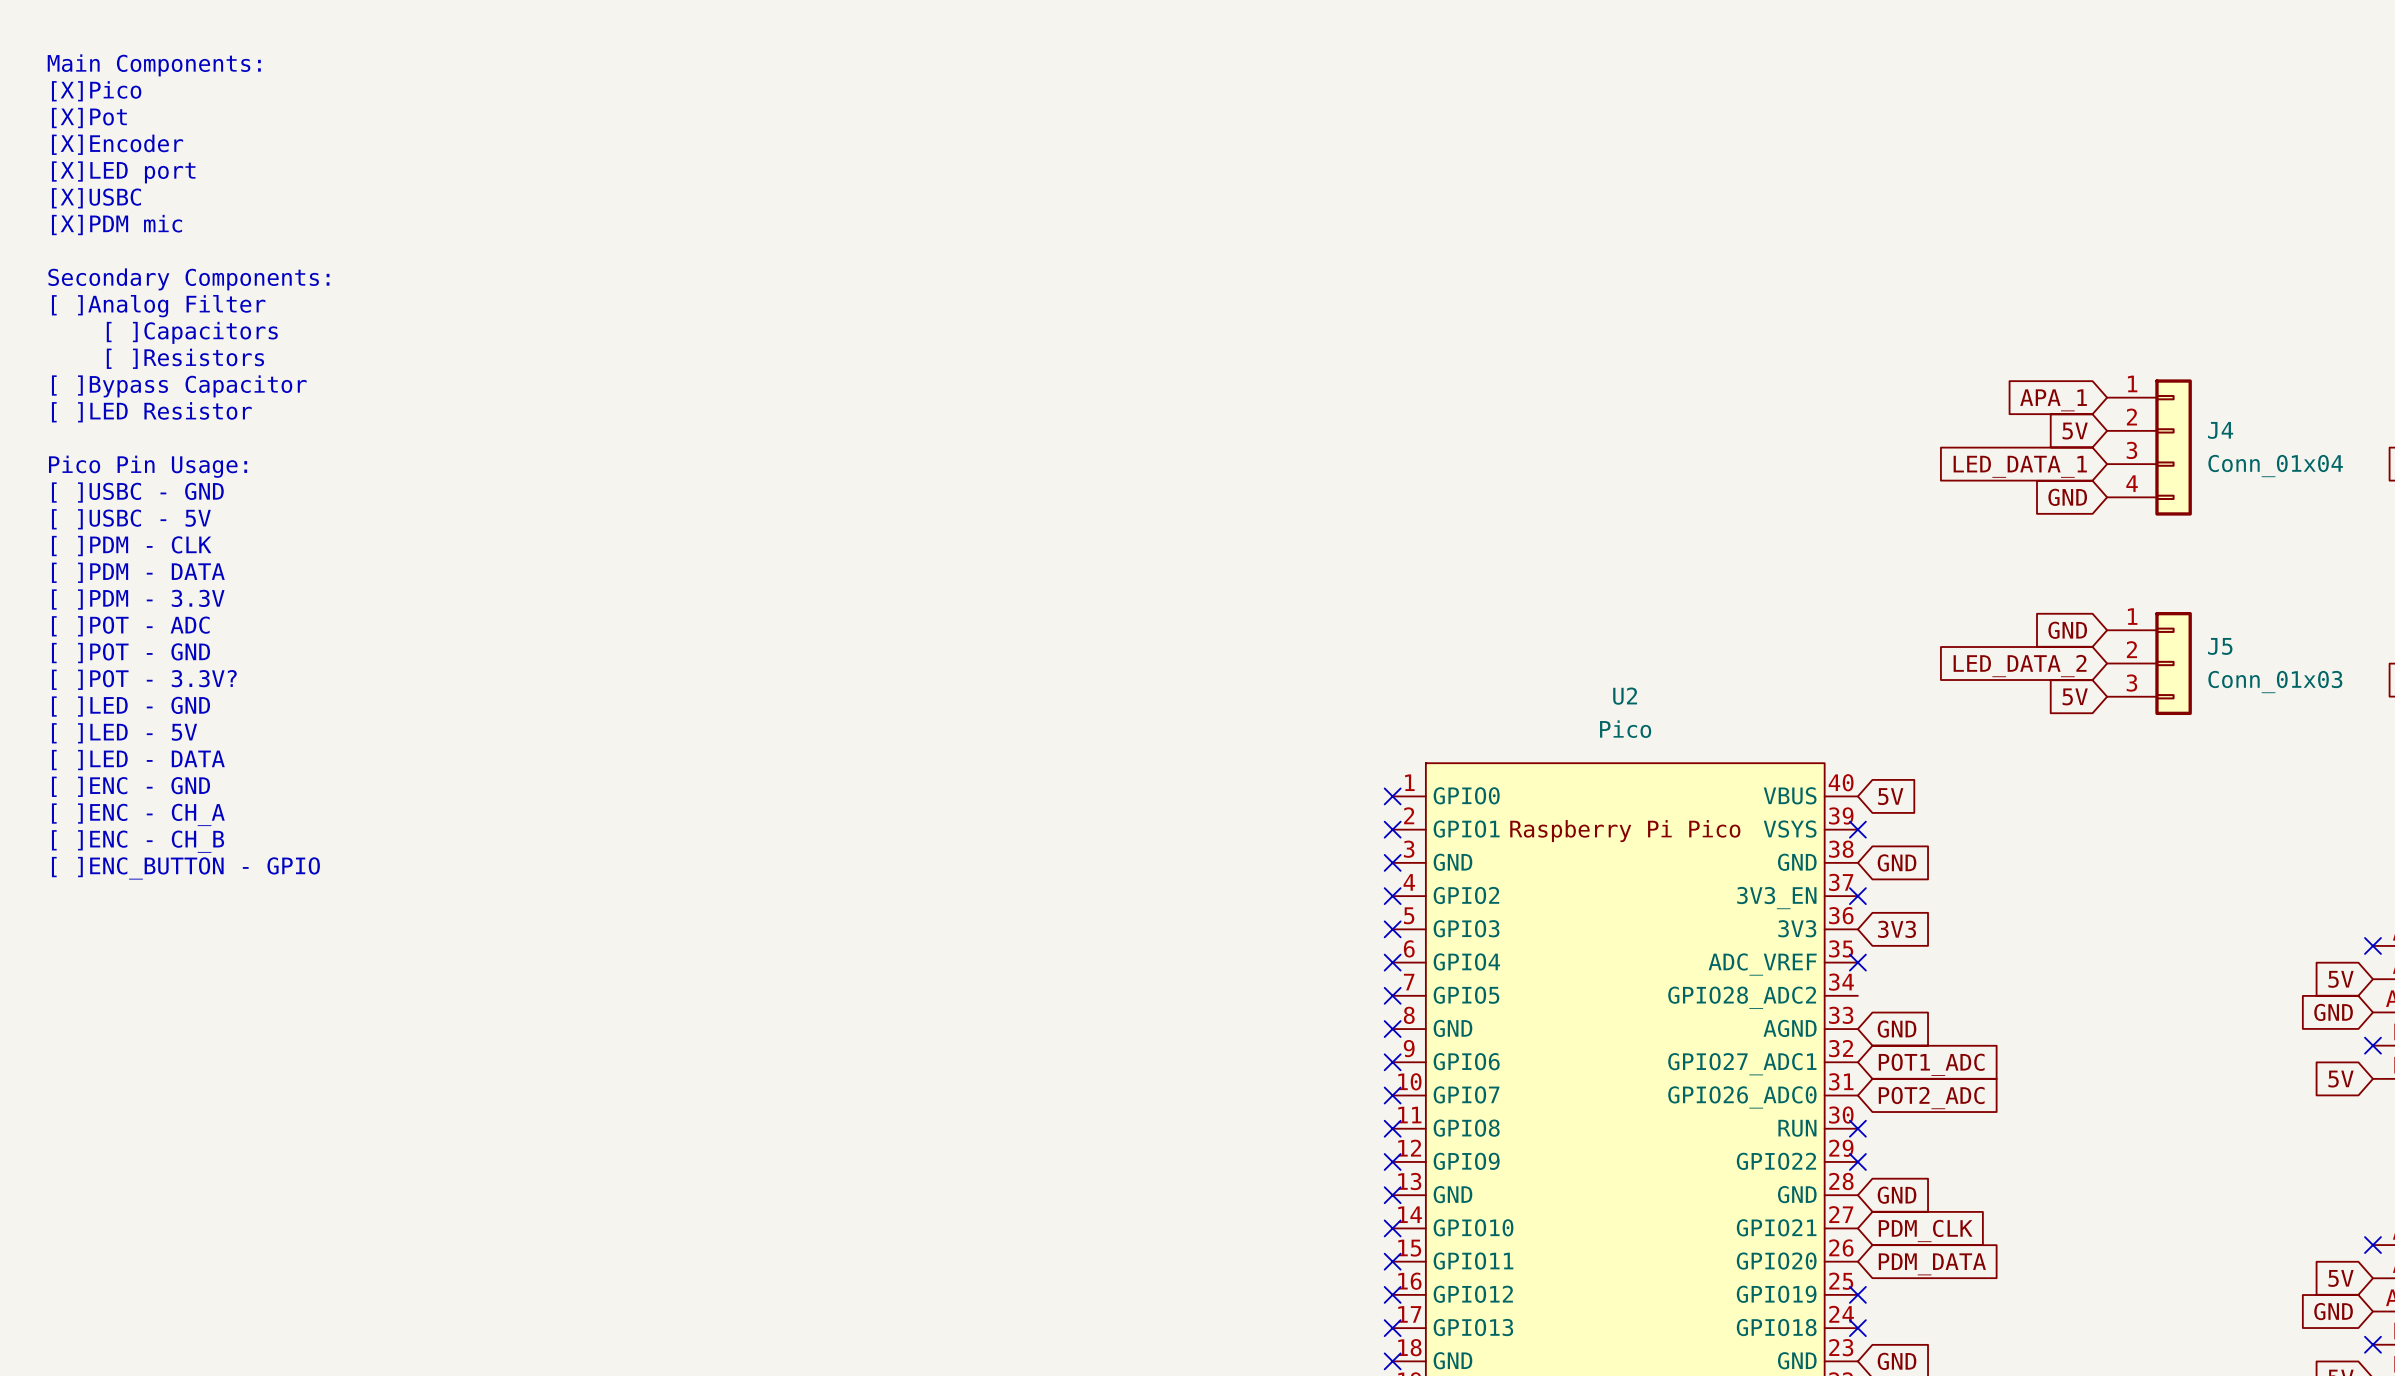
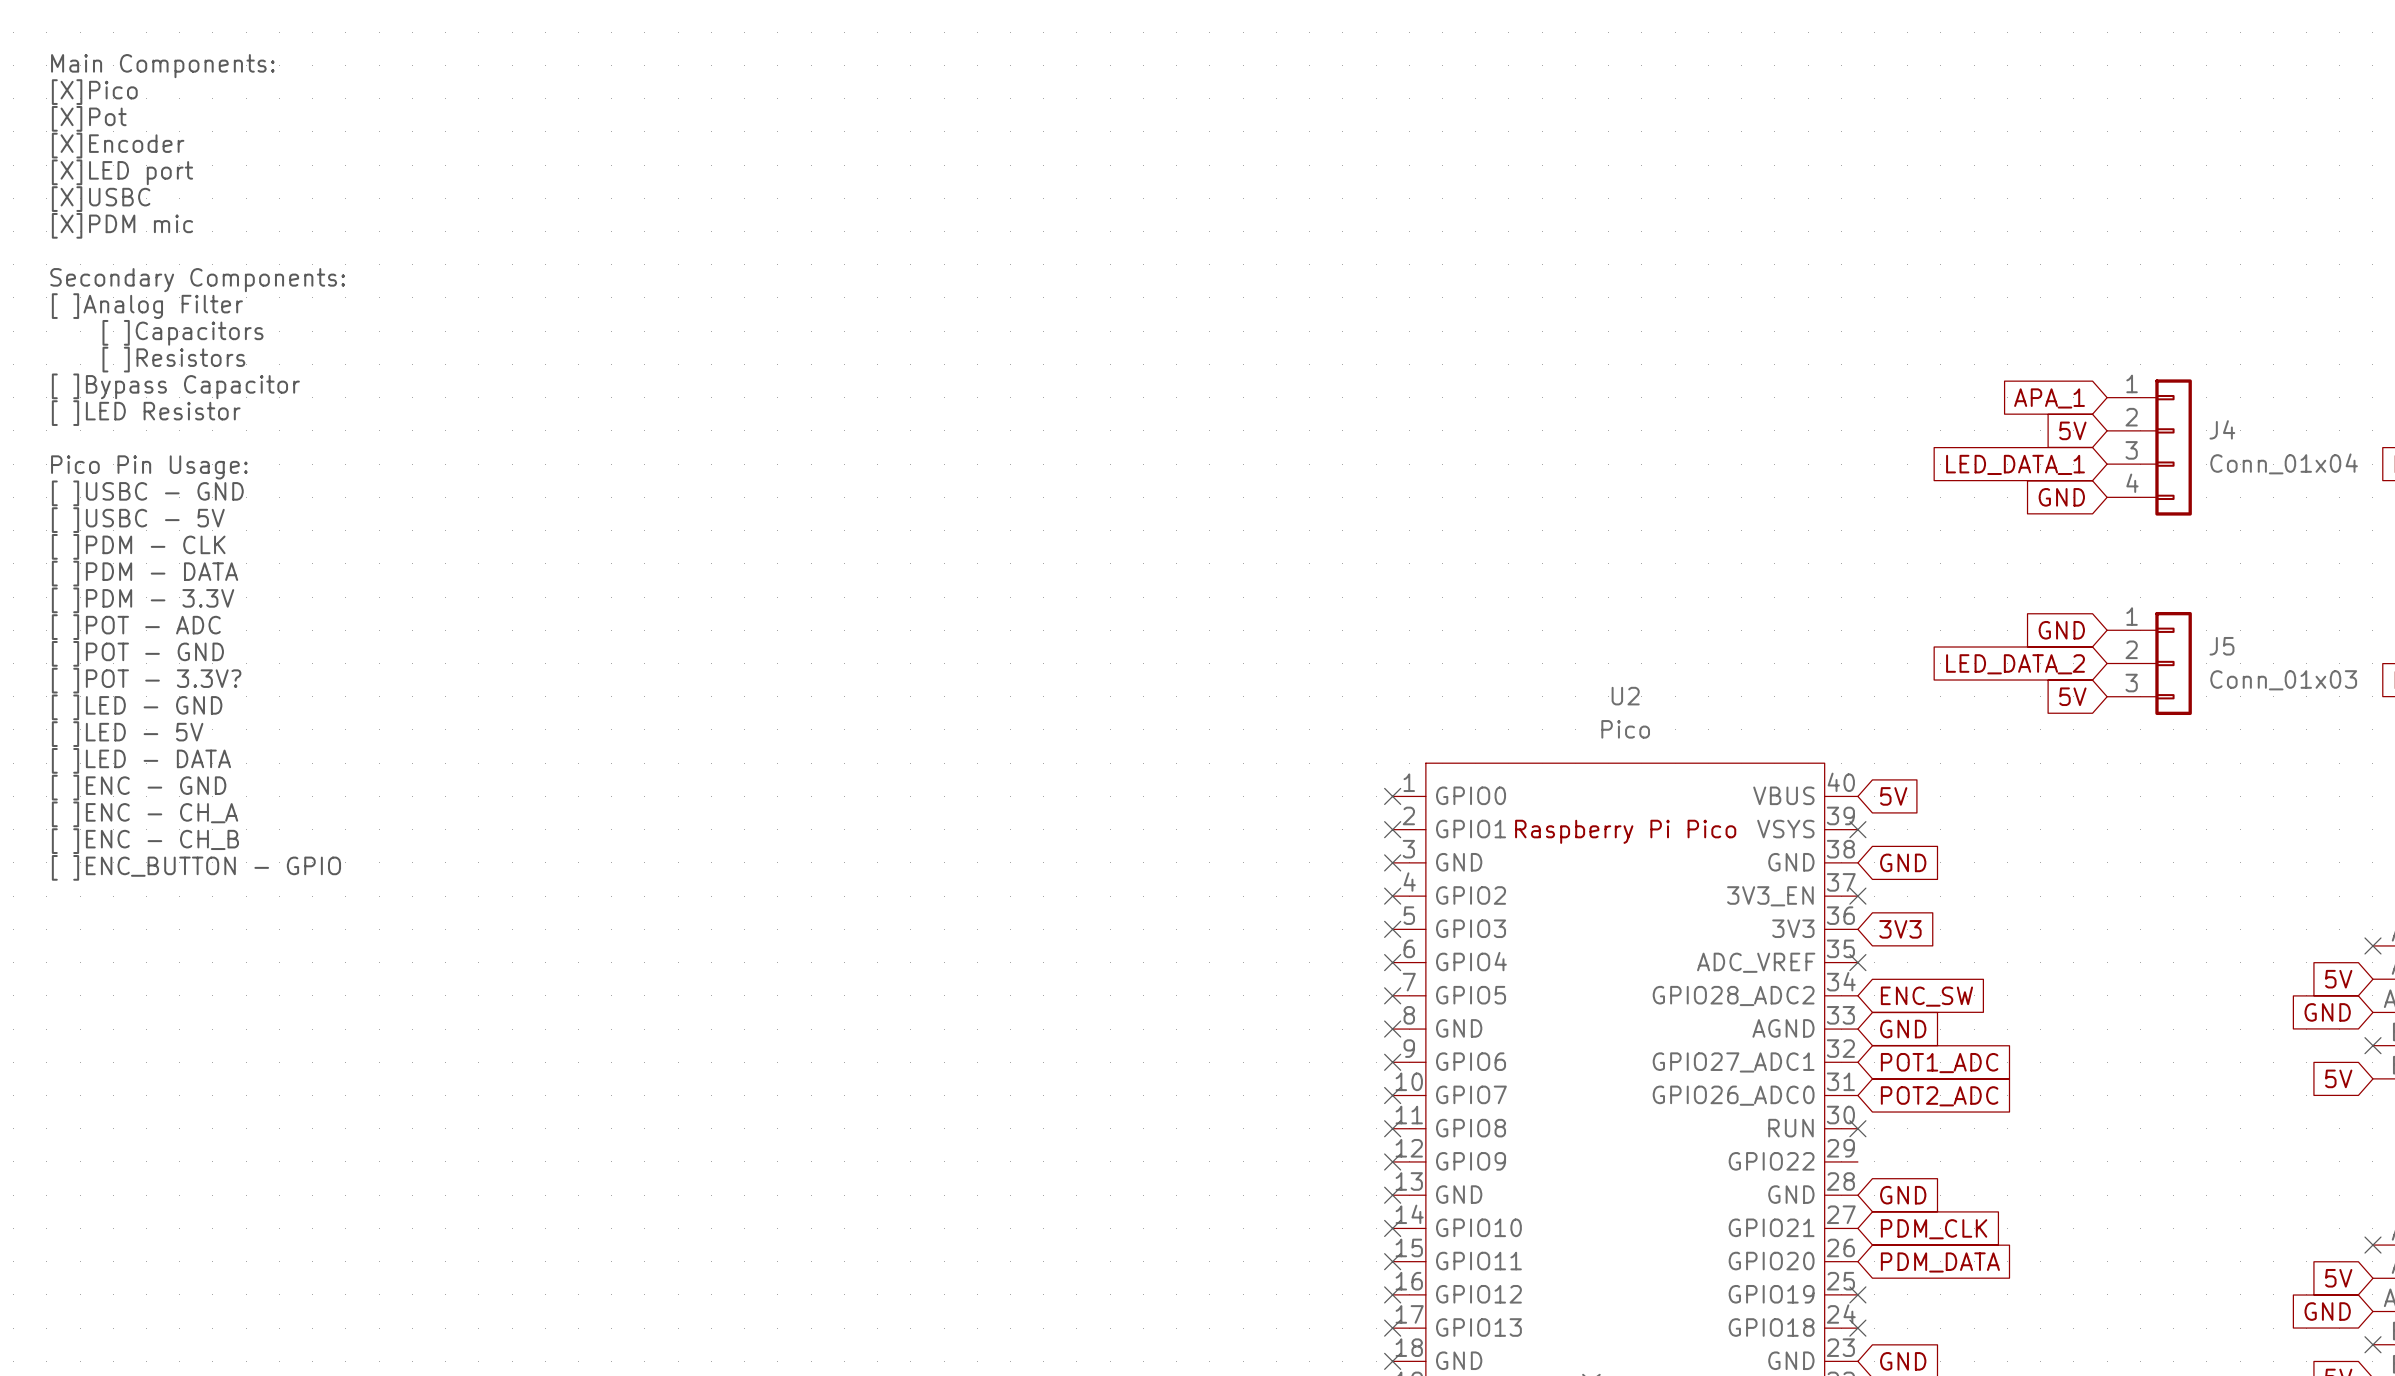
global label: none -> ENC_SW (1926, 996)
no-connect mark: (1857, 1161) -> none

